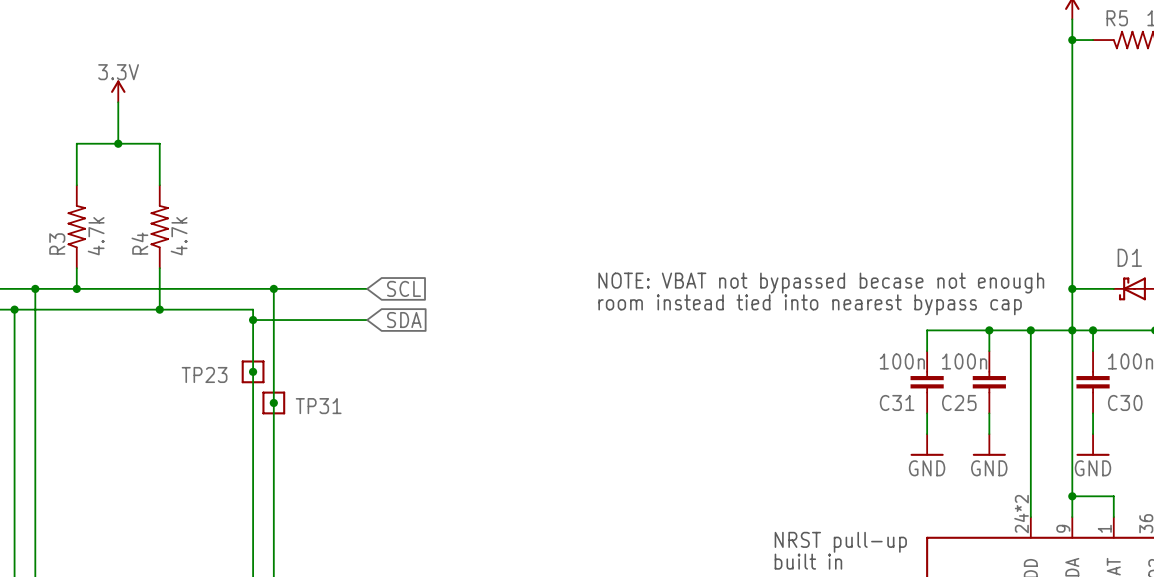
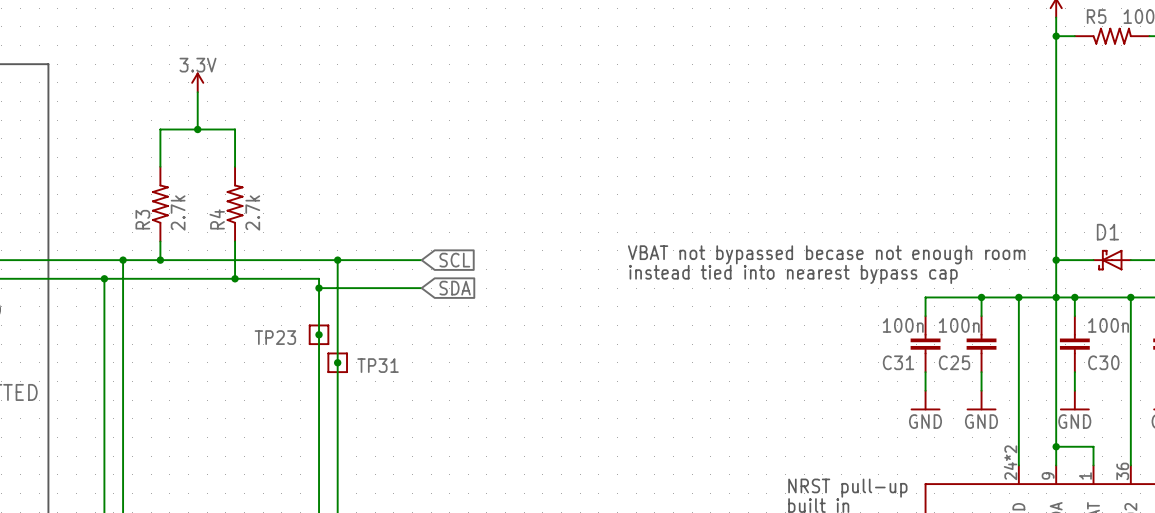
R3 value: 4.7k (96, 236) -> 2.7k (178, 212)
R4 value: 4.7k (179, 236) -> 2.7k (252, 212)
text: NOTE: VBAT not bypassed becase not enough (821, 283) -> VBAT not bypassed becase not enough room (826, 254)
text: room instead tied into nearest bypass cap (810, 304) -> instead tied into nearest bypass cap (793, 274)

